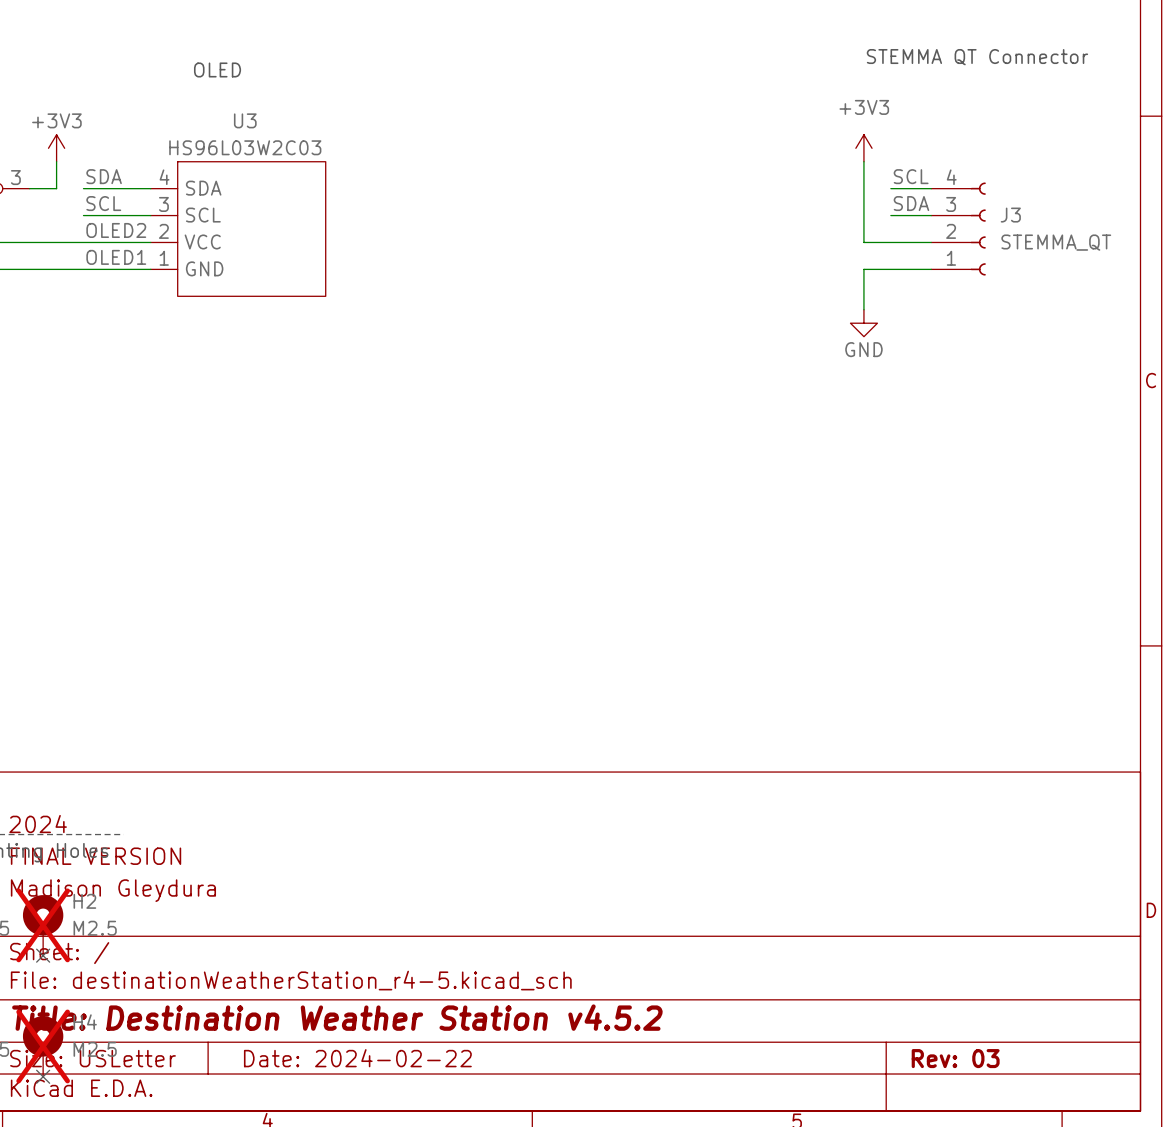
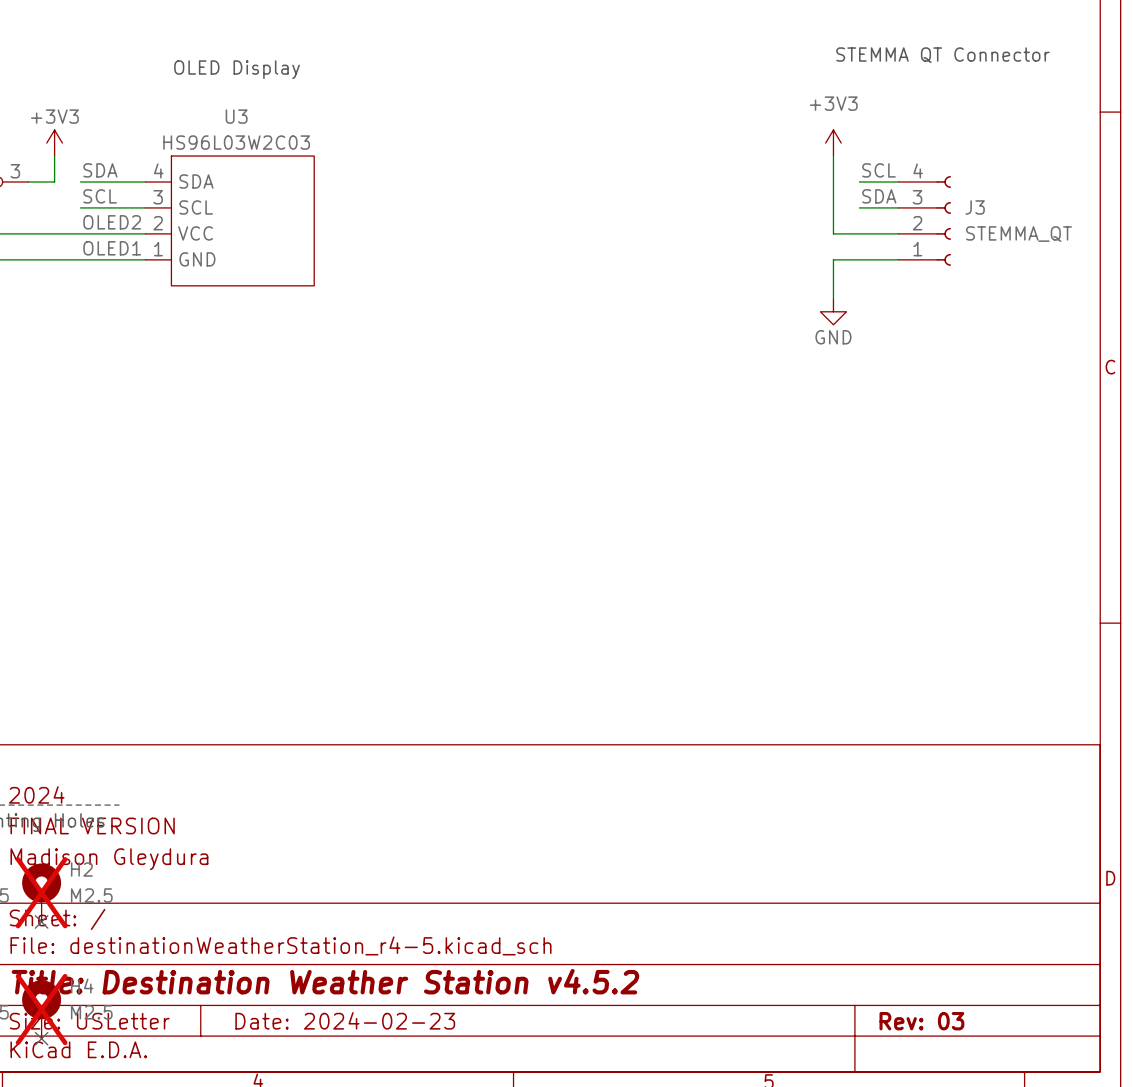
text: OLED (217, 69) -> none
text: none -> OLED Display (237, 69)
title block: Date: 2024-02-22 (357, 1058) -> Date: 2024-02-23 (345, 1020)

